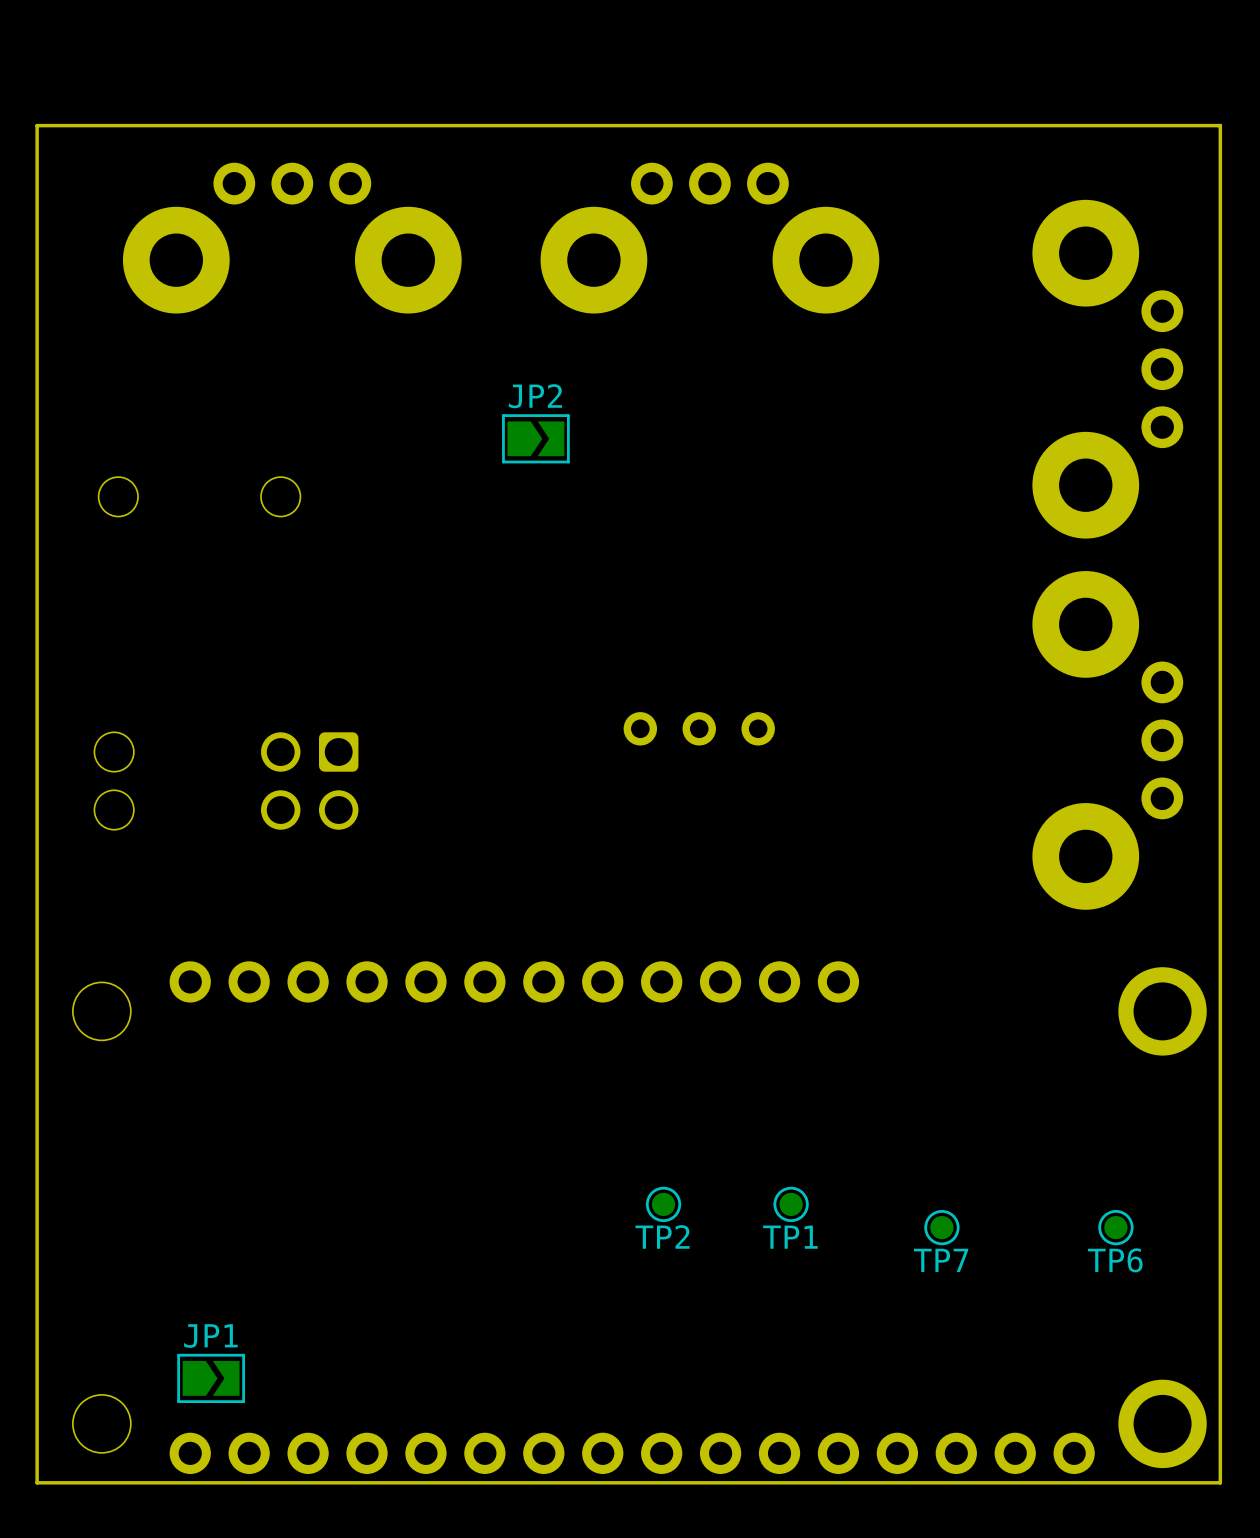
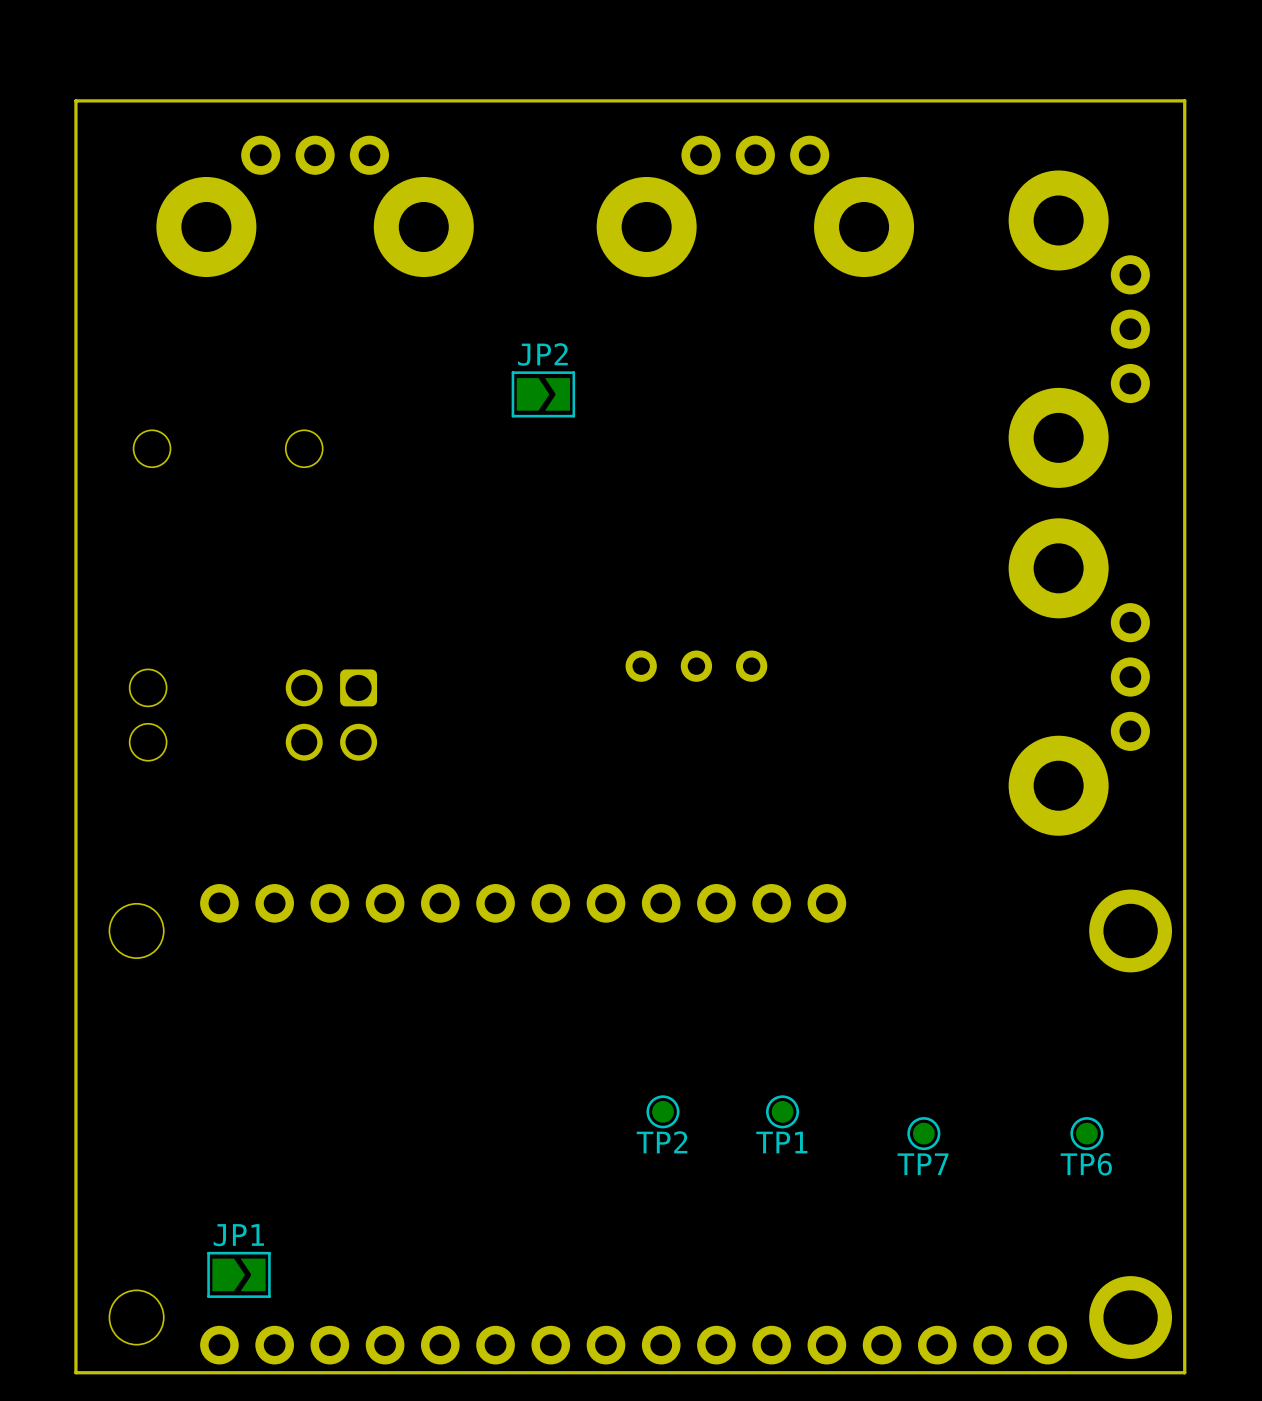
part position: (709, 238) -> (755, 206)

